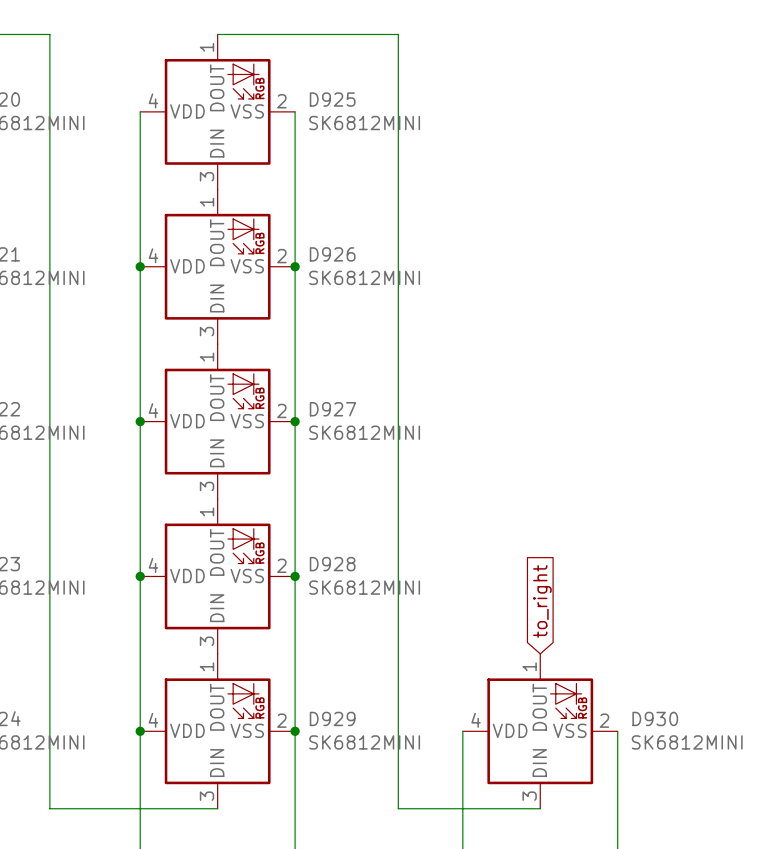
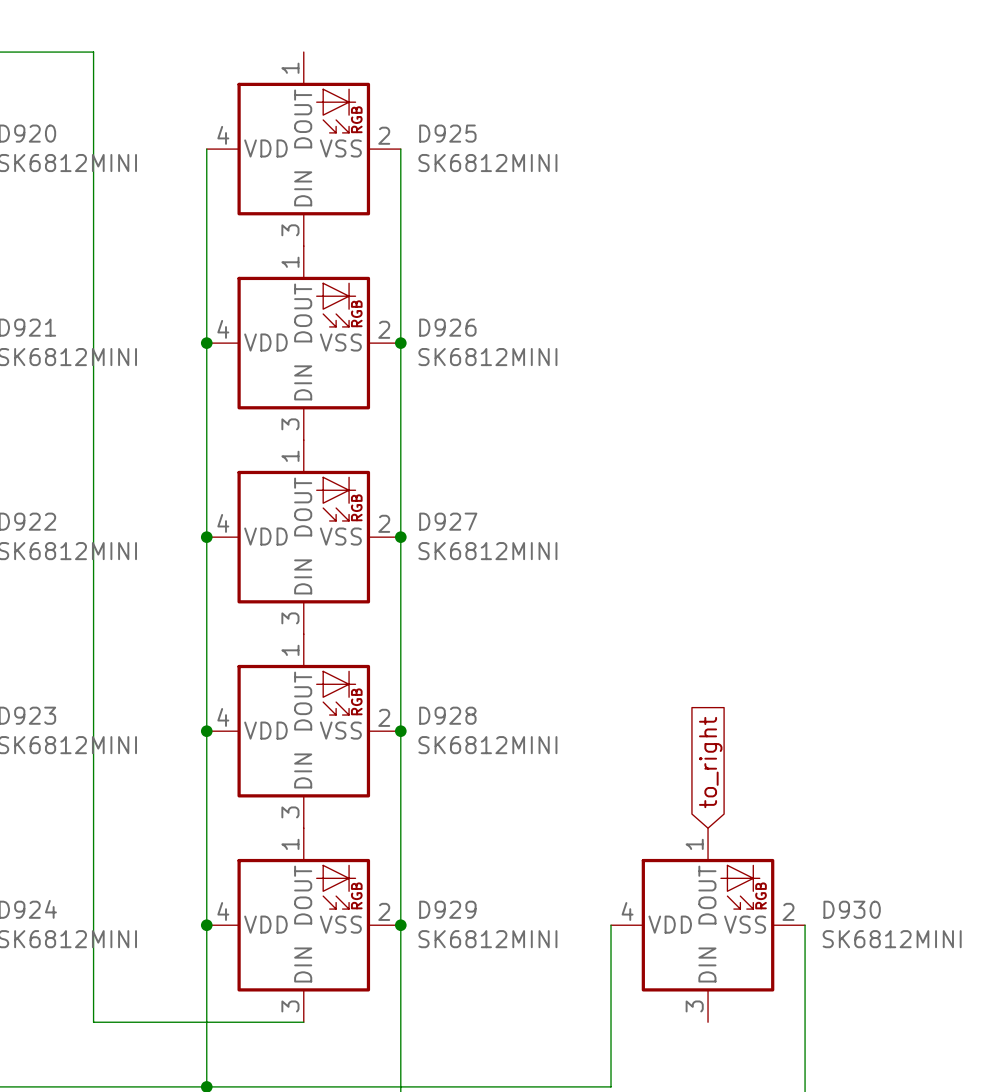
wire: (217, 34) (398, 34) (398, 808) (540, 808) -> none

